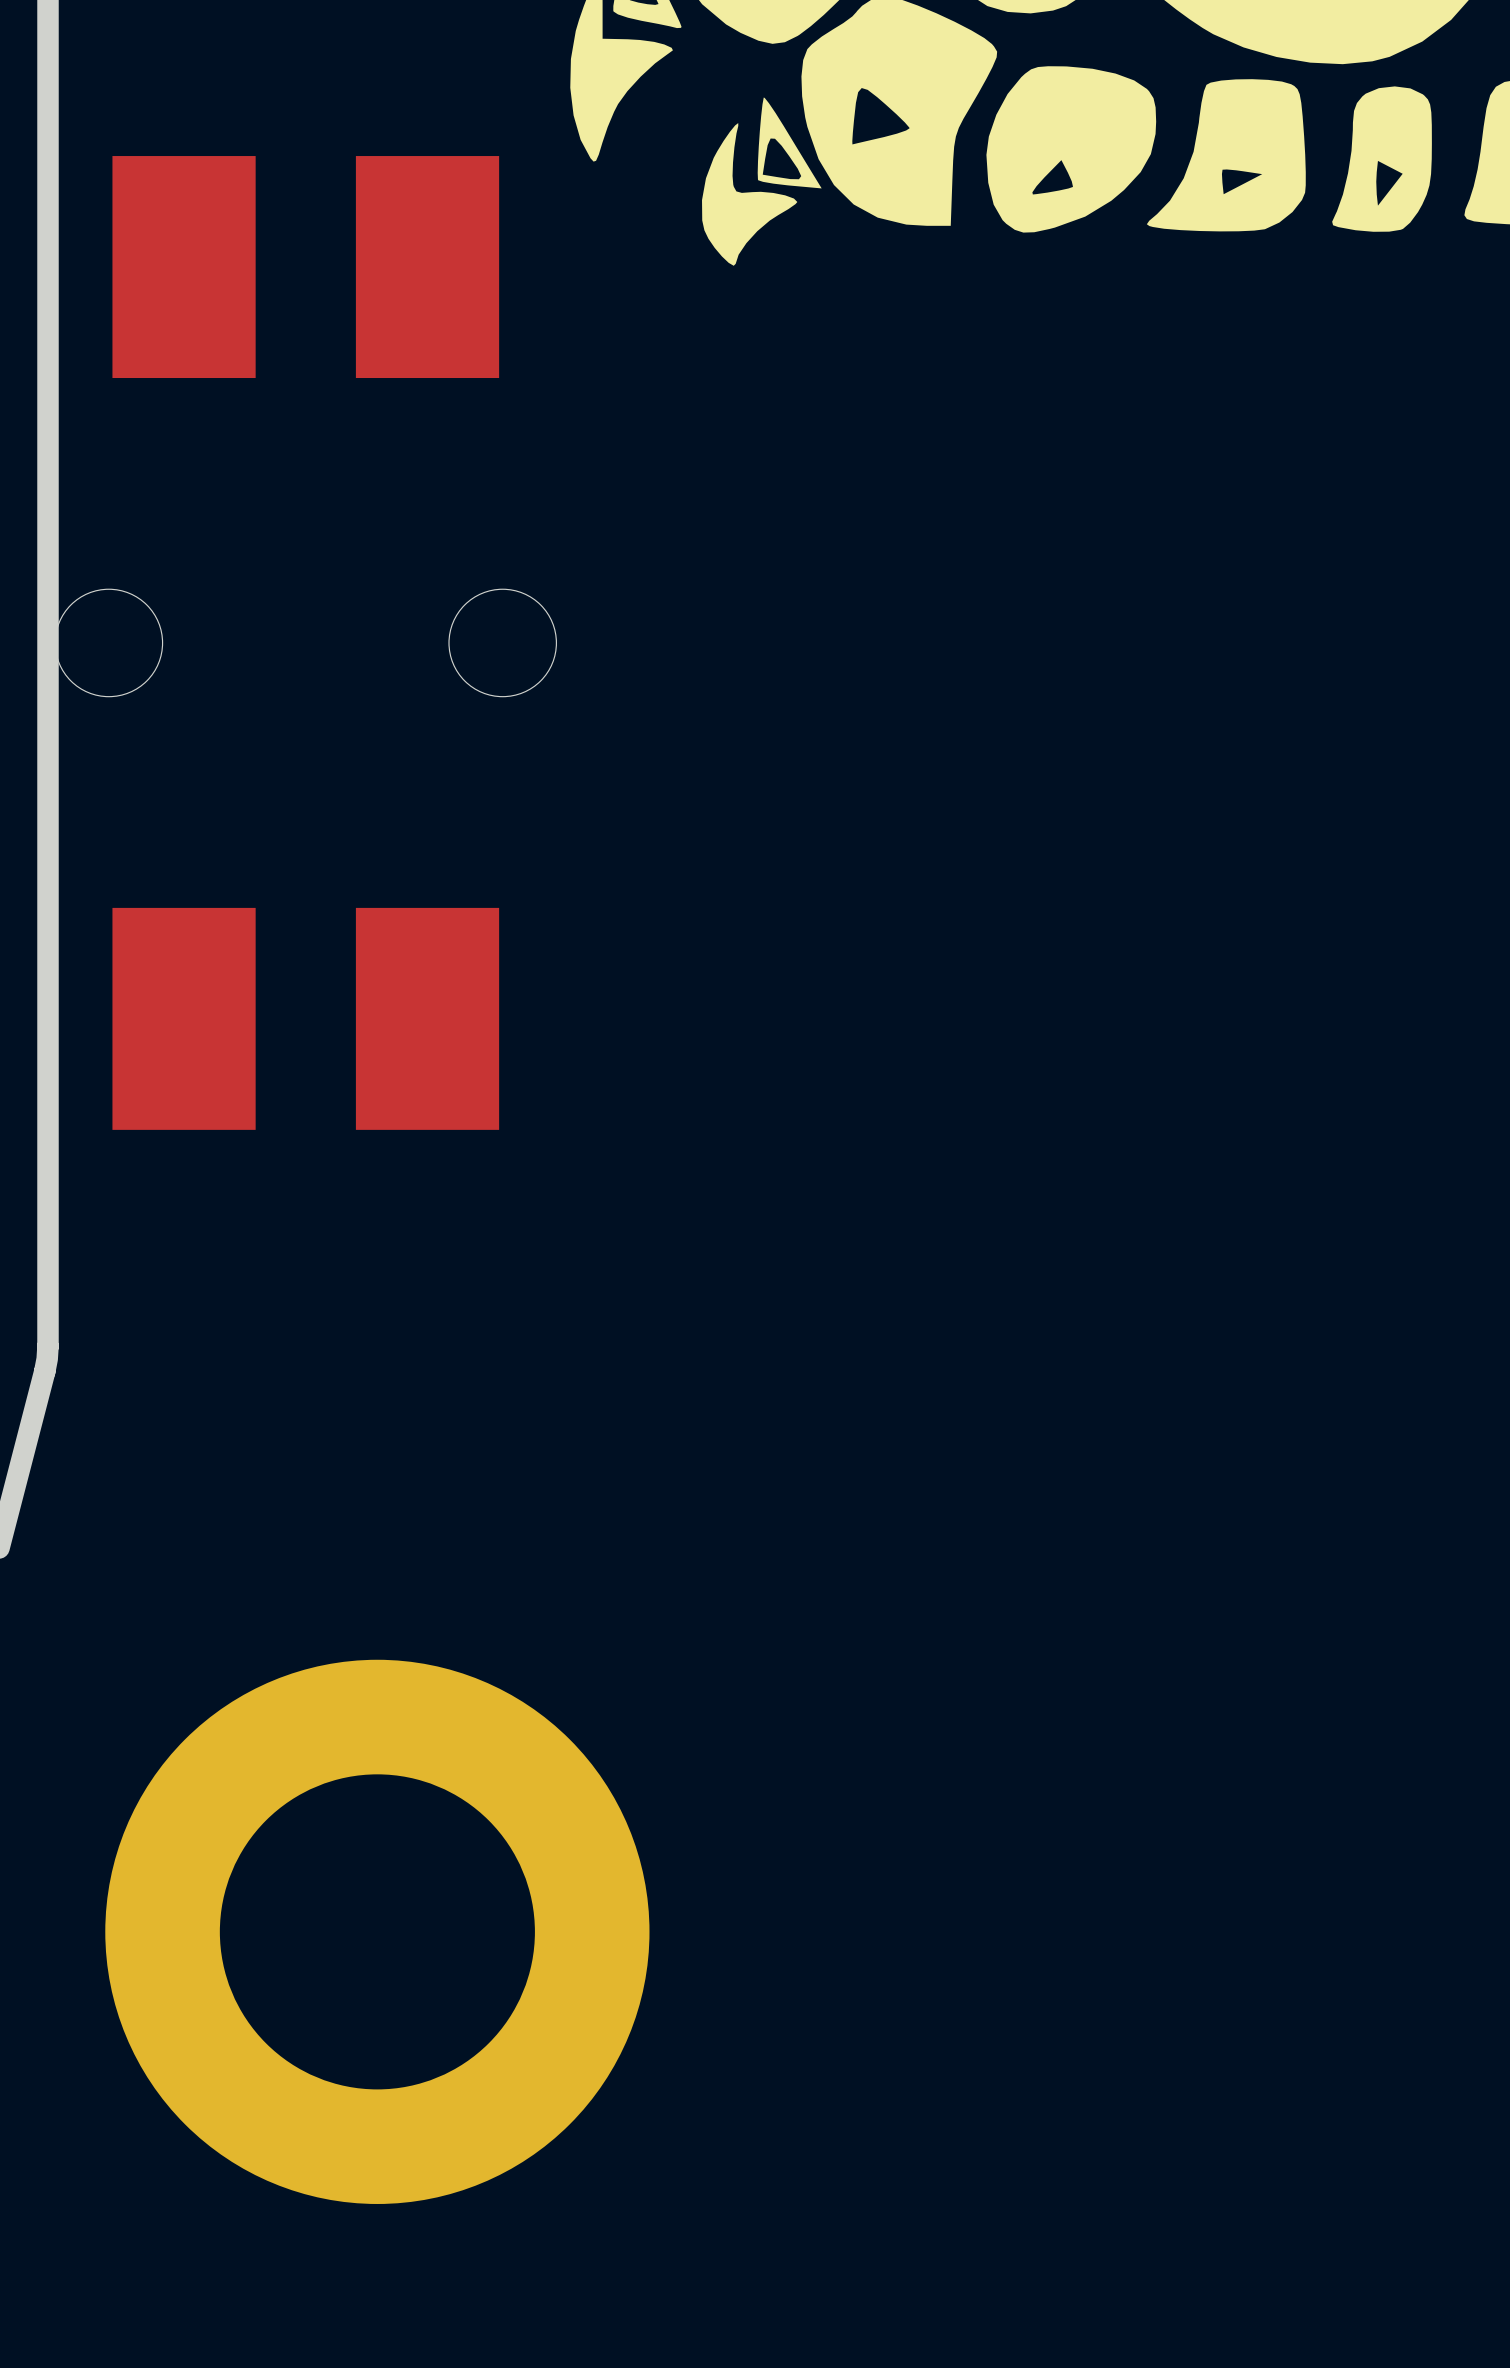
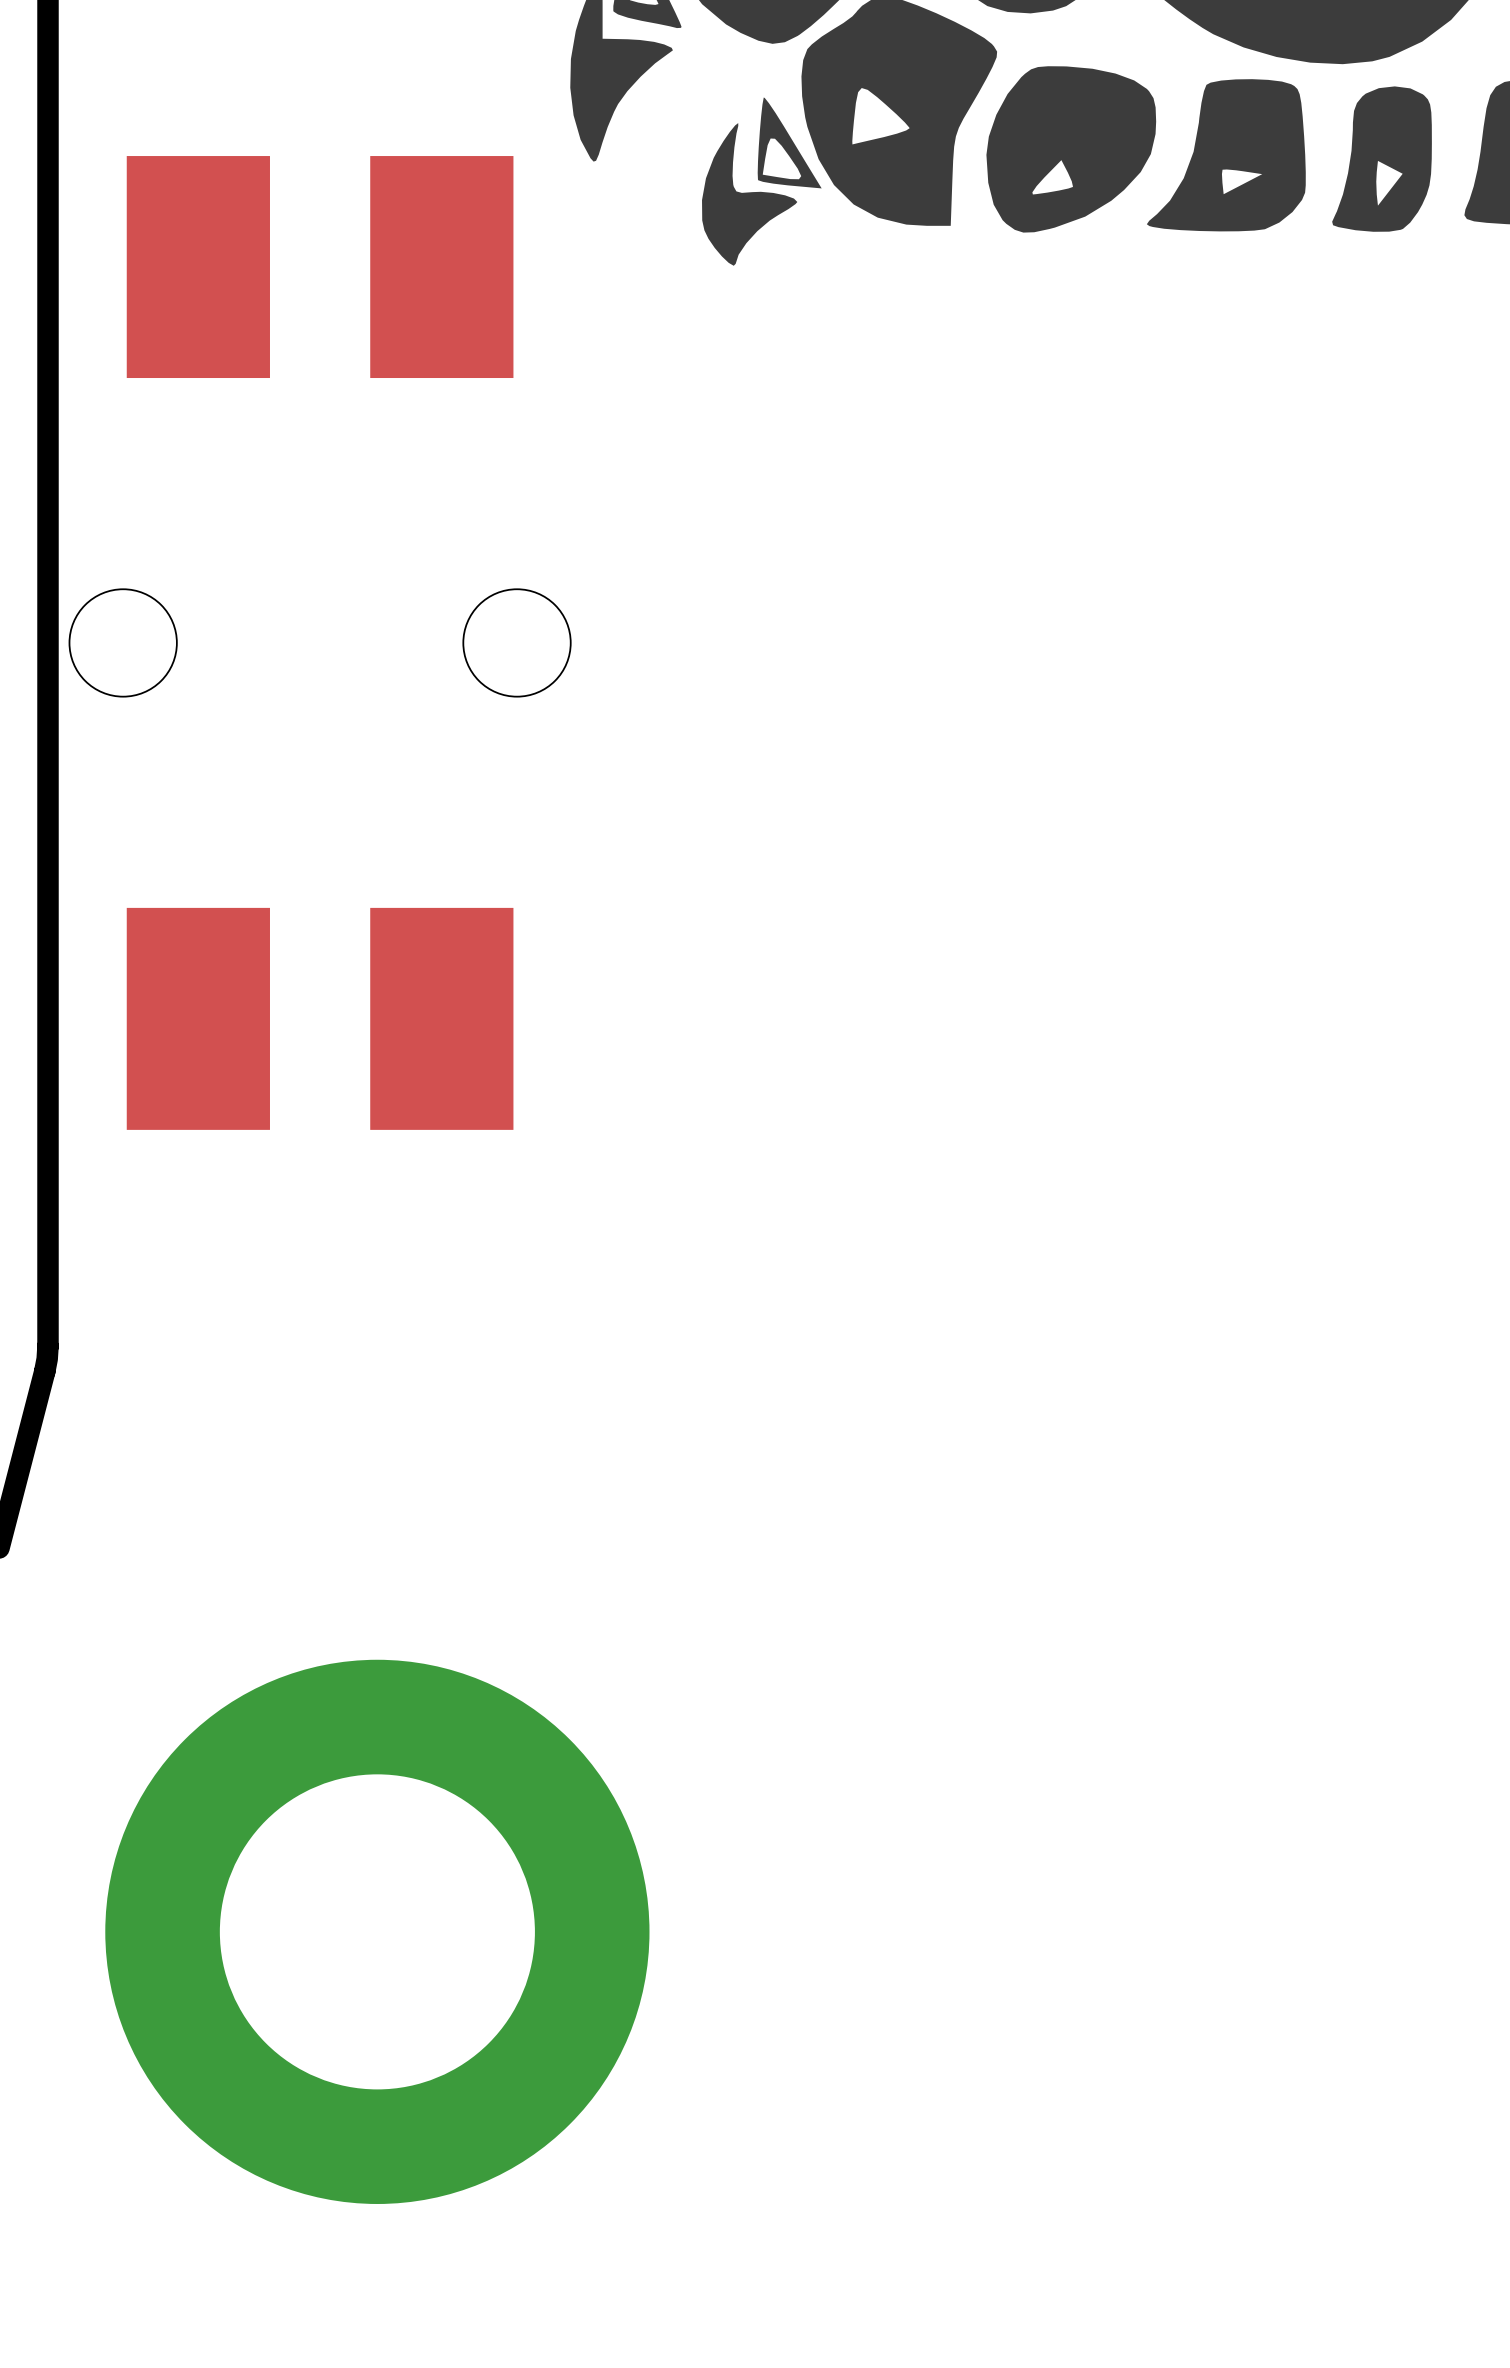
part position: (305, 642) -> (320, 642)

